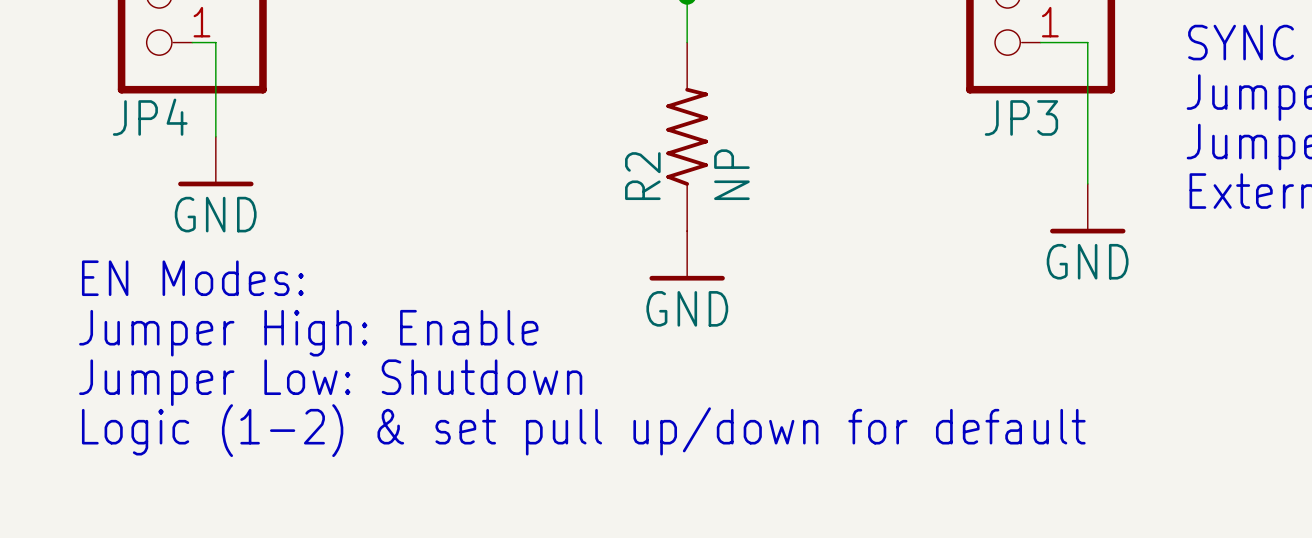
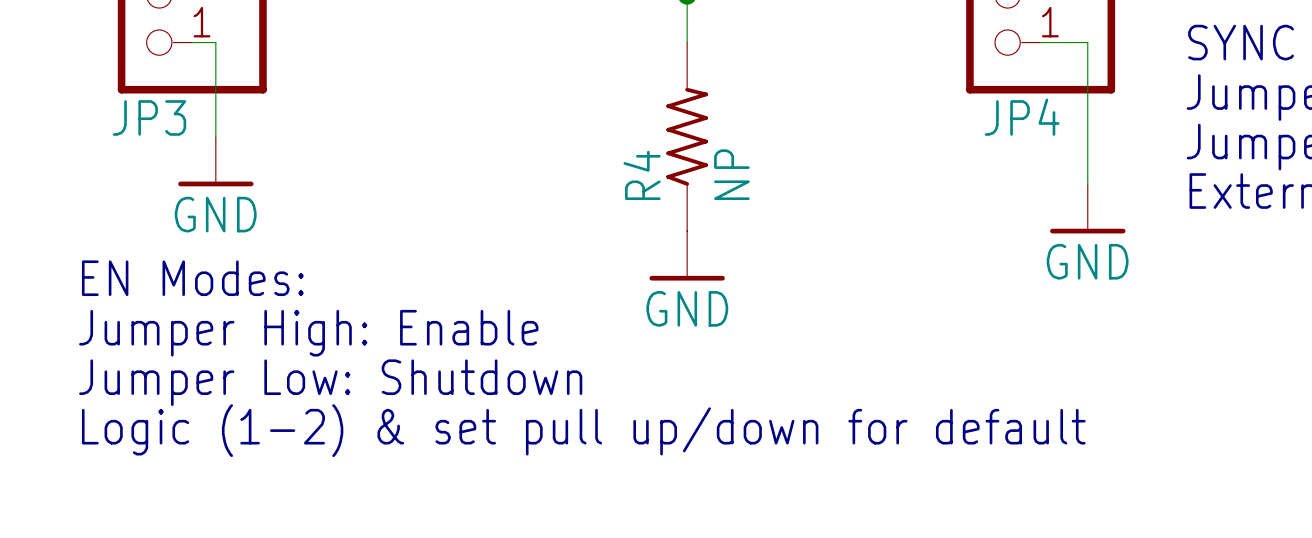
JP4 name: JP4 (150, 117) -> JP3 (149, 117)
JP3 name: JP3 (1021, 117) -> JP4 (1022, 117)
R2 name: R2 (642, 176) -> R4 (642, 175)

